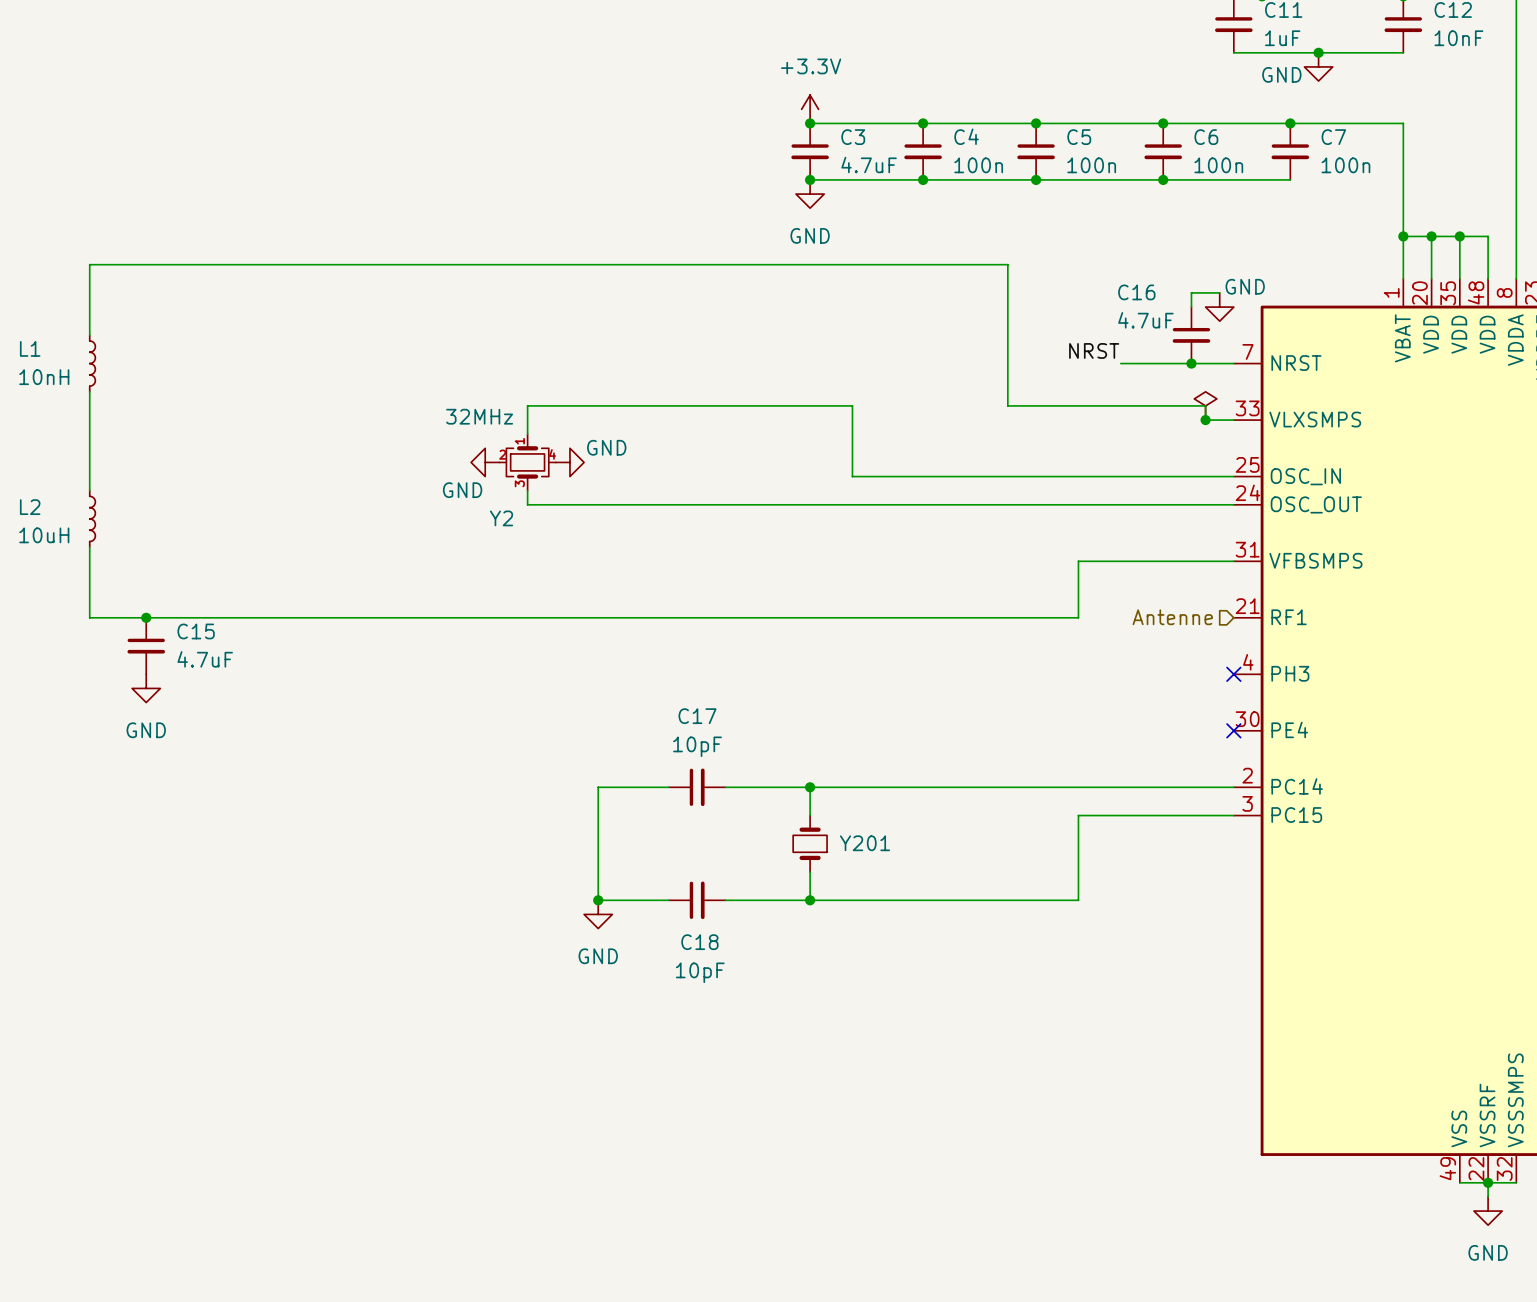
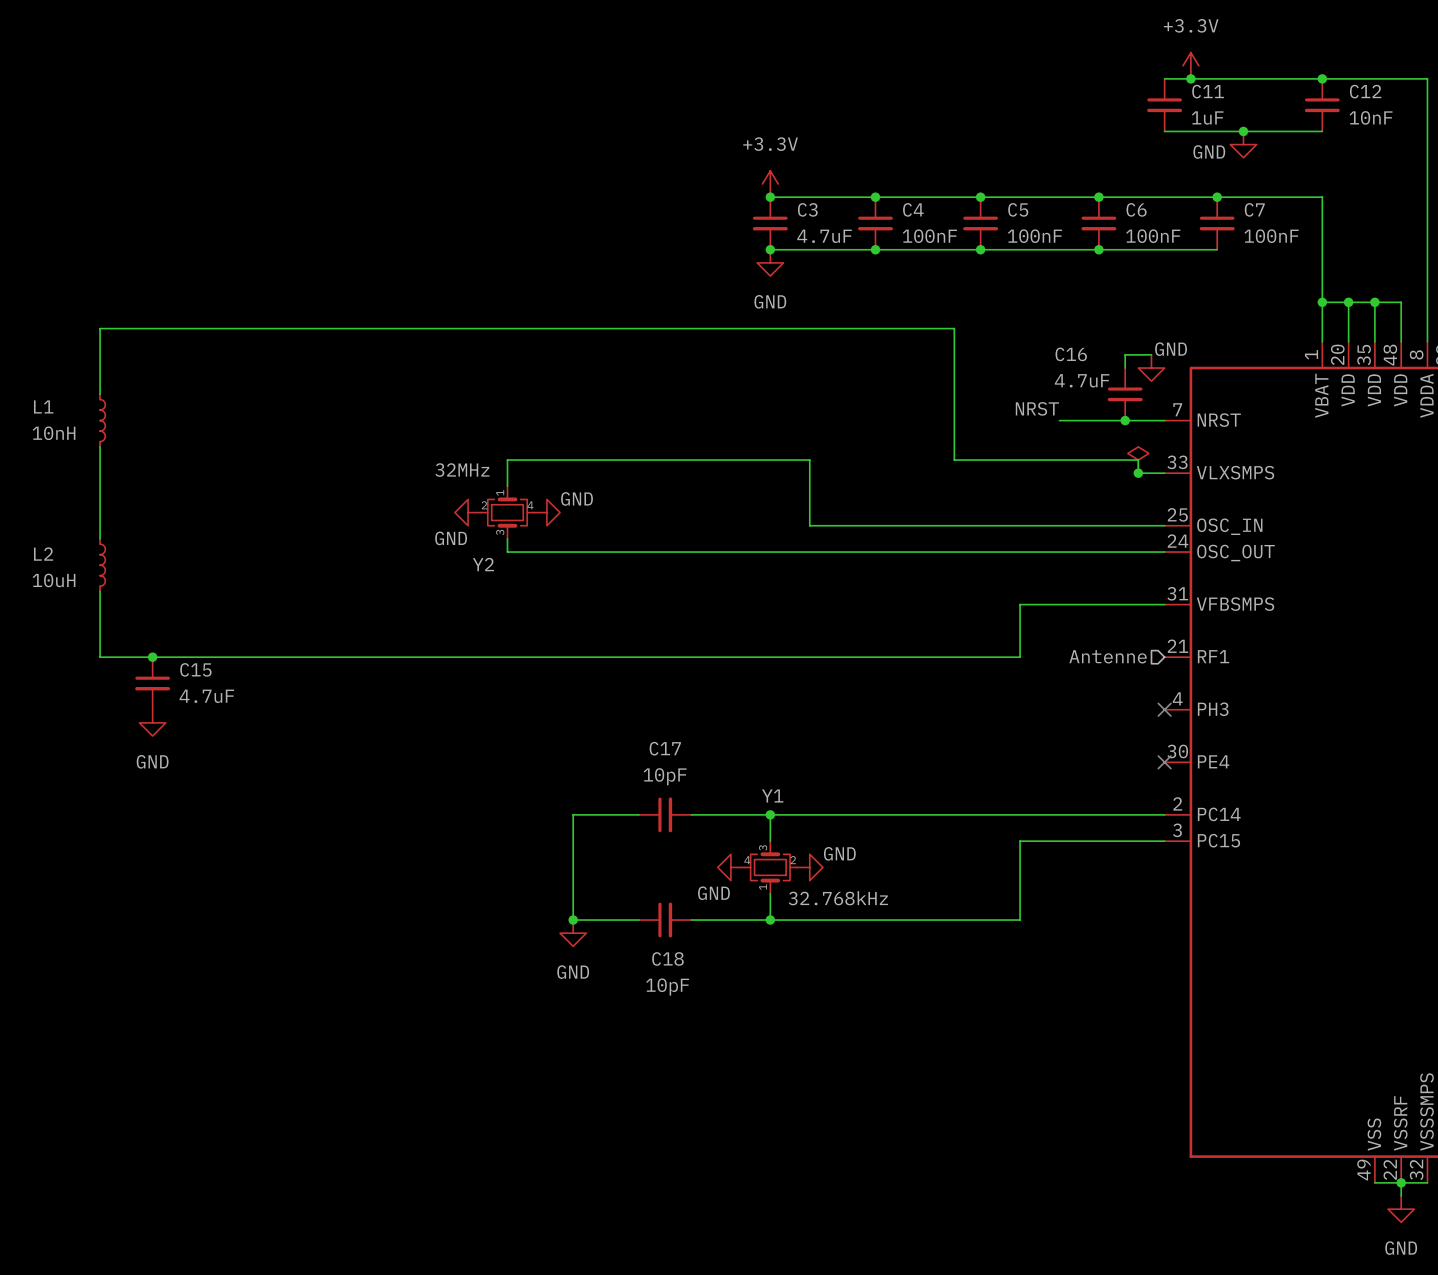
C4 value: 100n (978, 165) -> 100nF (929, 236)
C5 value: 100n (1091, 165) -> 100nF (1034, 236)
C6 value: 100n (1218, 165) -> 100nF (1153, 236)
C7 value: 100n (1345, 165) -> 100nF (1271, 236)
power symbol: none -> GND (730, 867)
Y201: (810, 843) -> none
Y1: none -> 32.768kHz (770, 867)
power symbol: none -> GND (809, 867)

